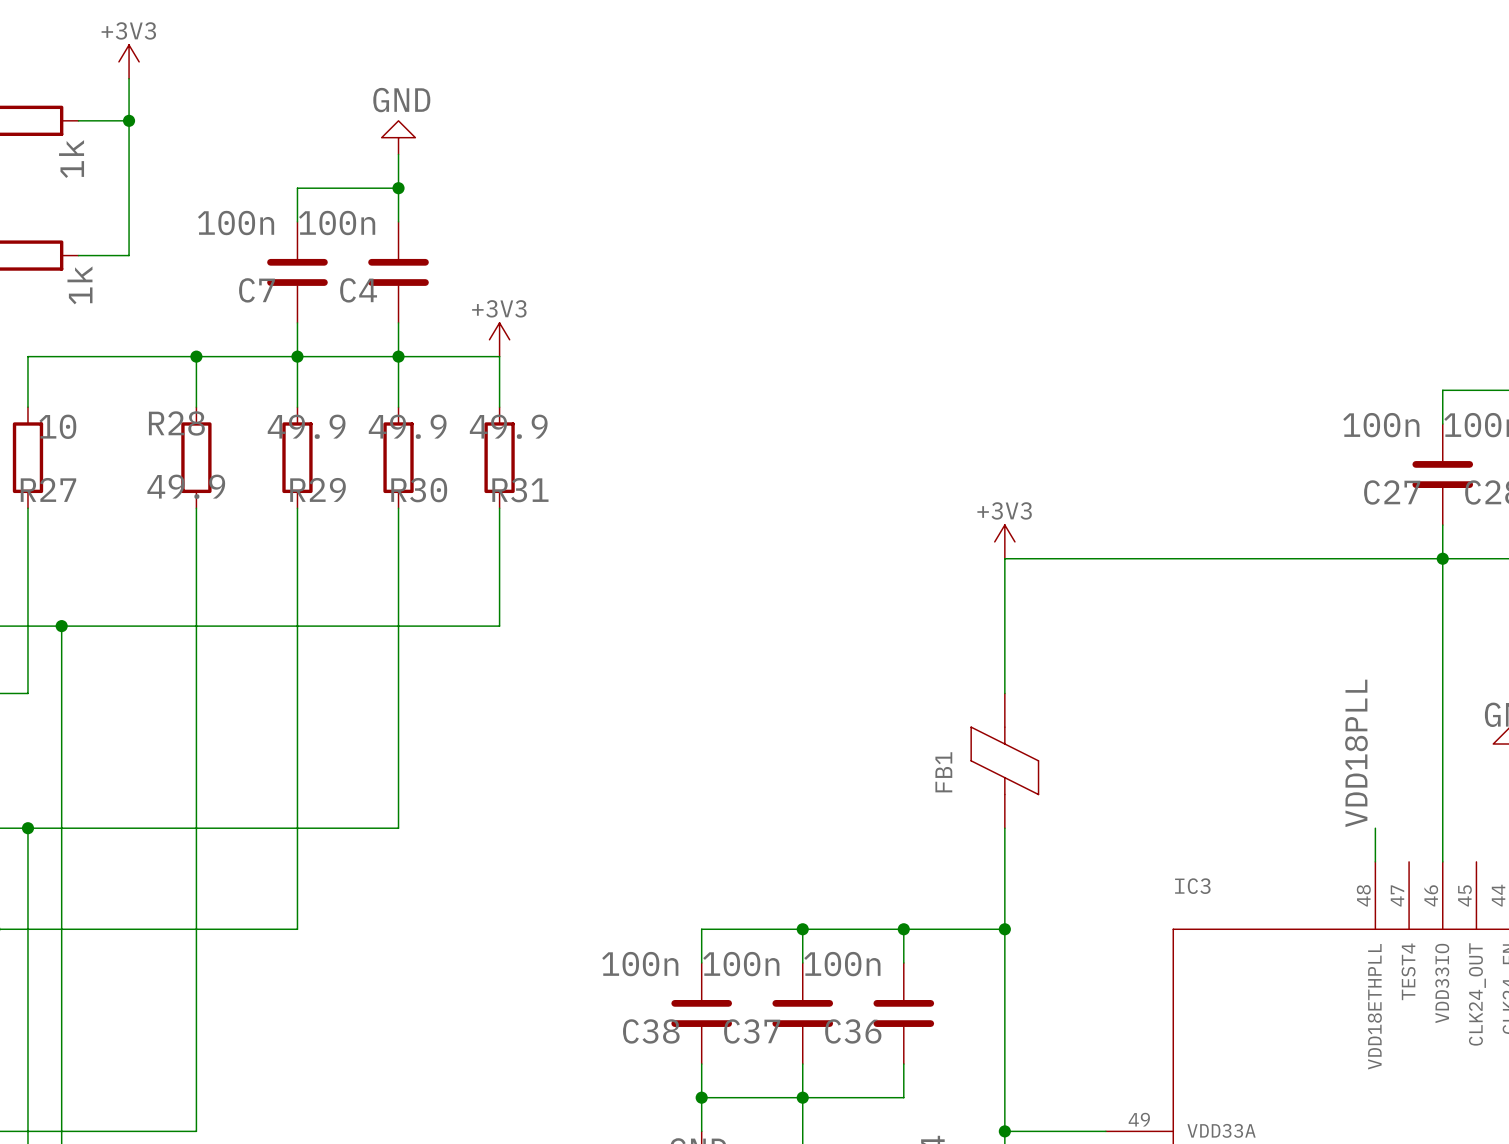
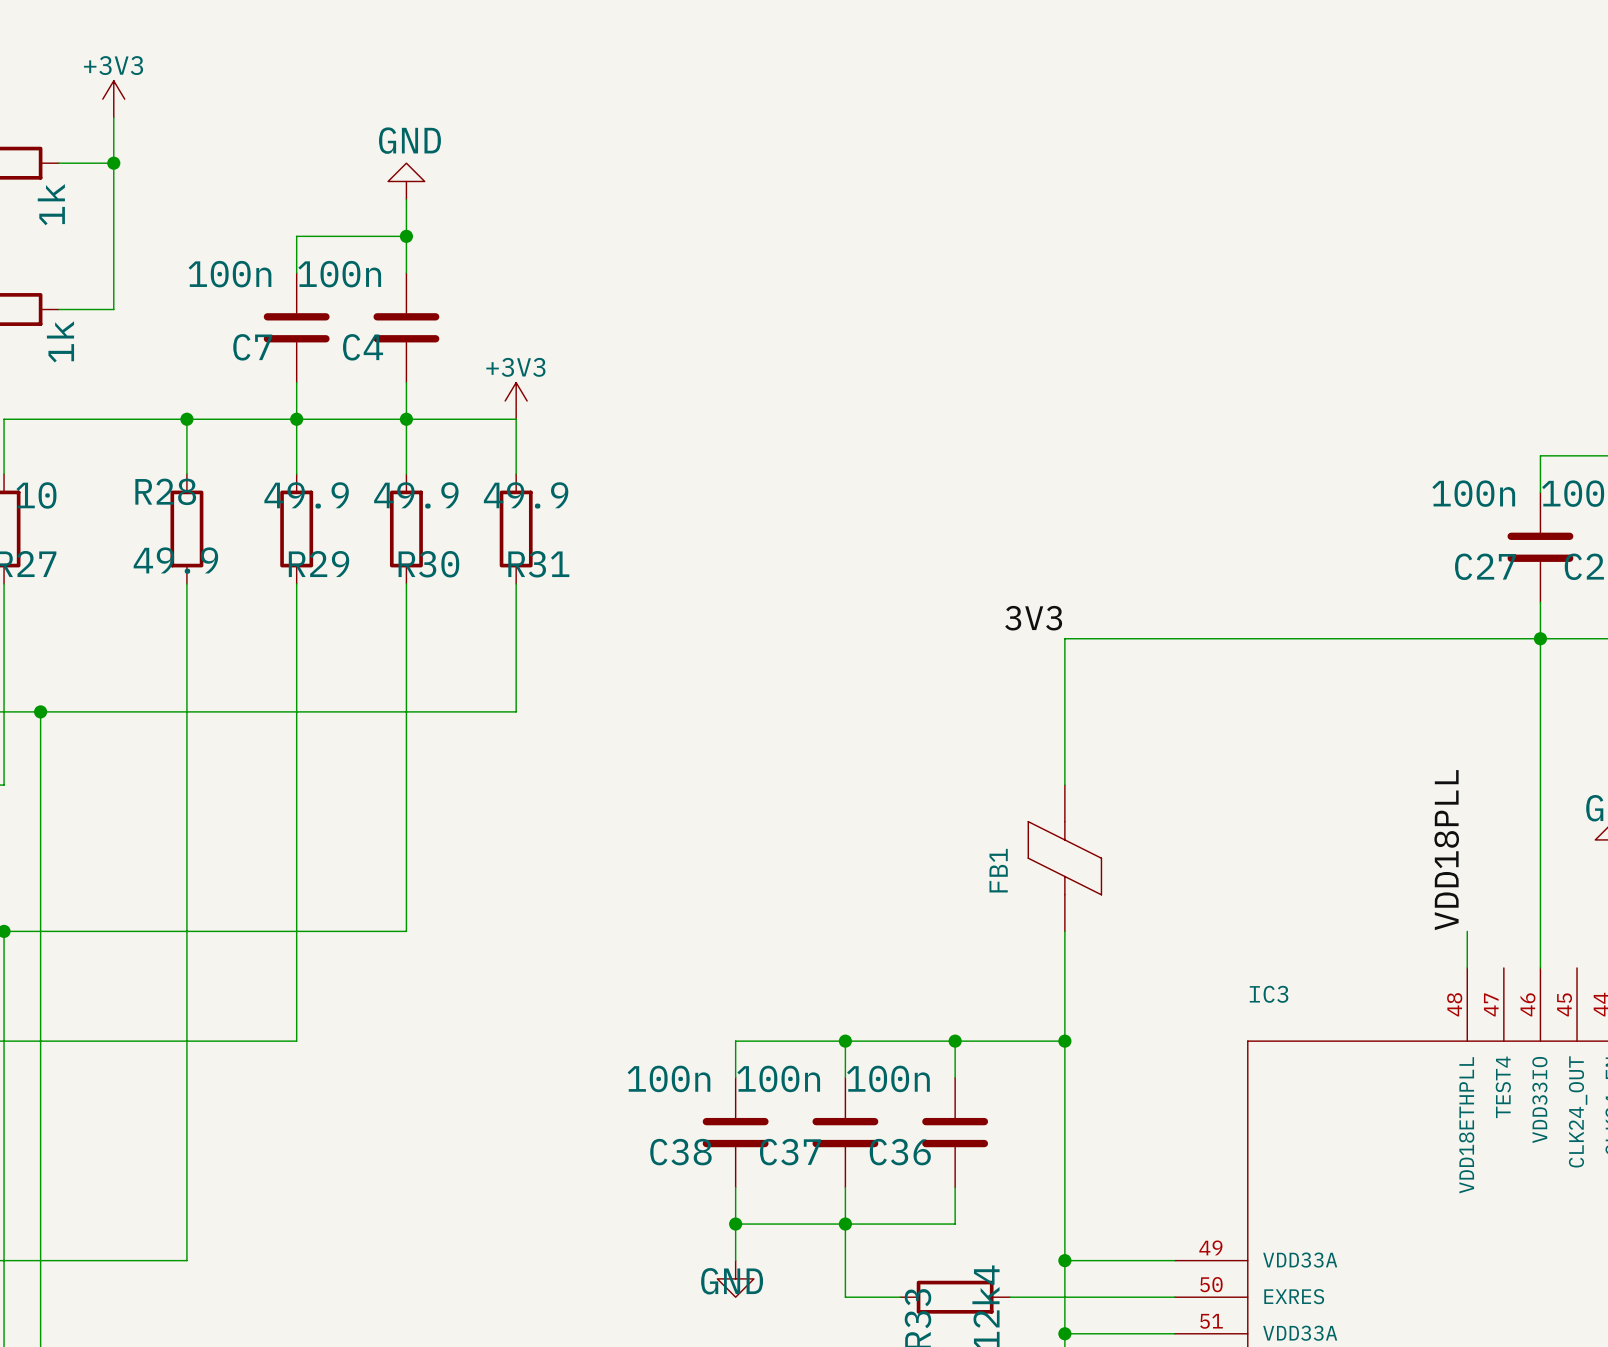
label: none -> 3V3 (1033, 618)
power symbol: +3V3 (1004, 541) -> none

